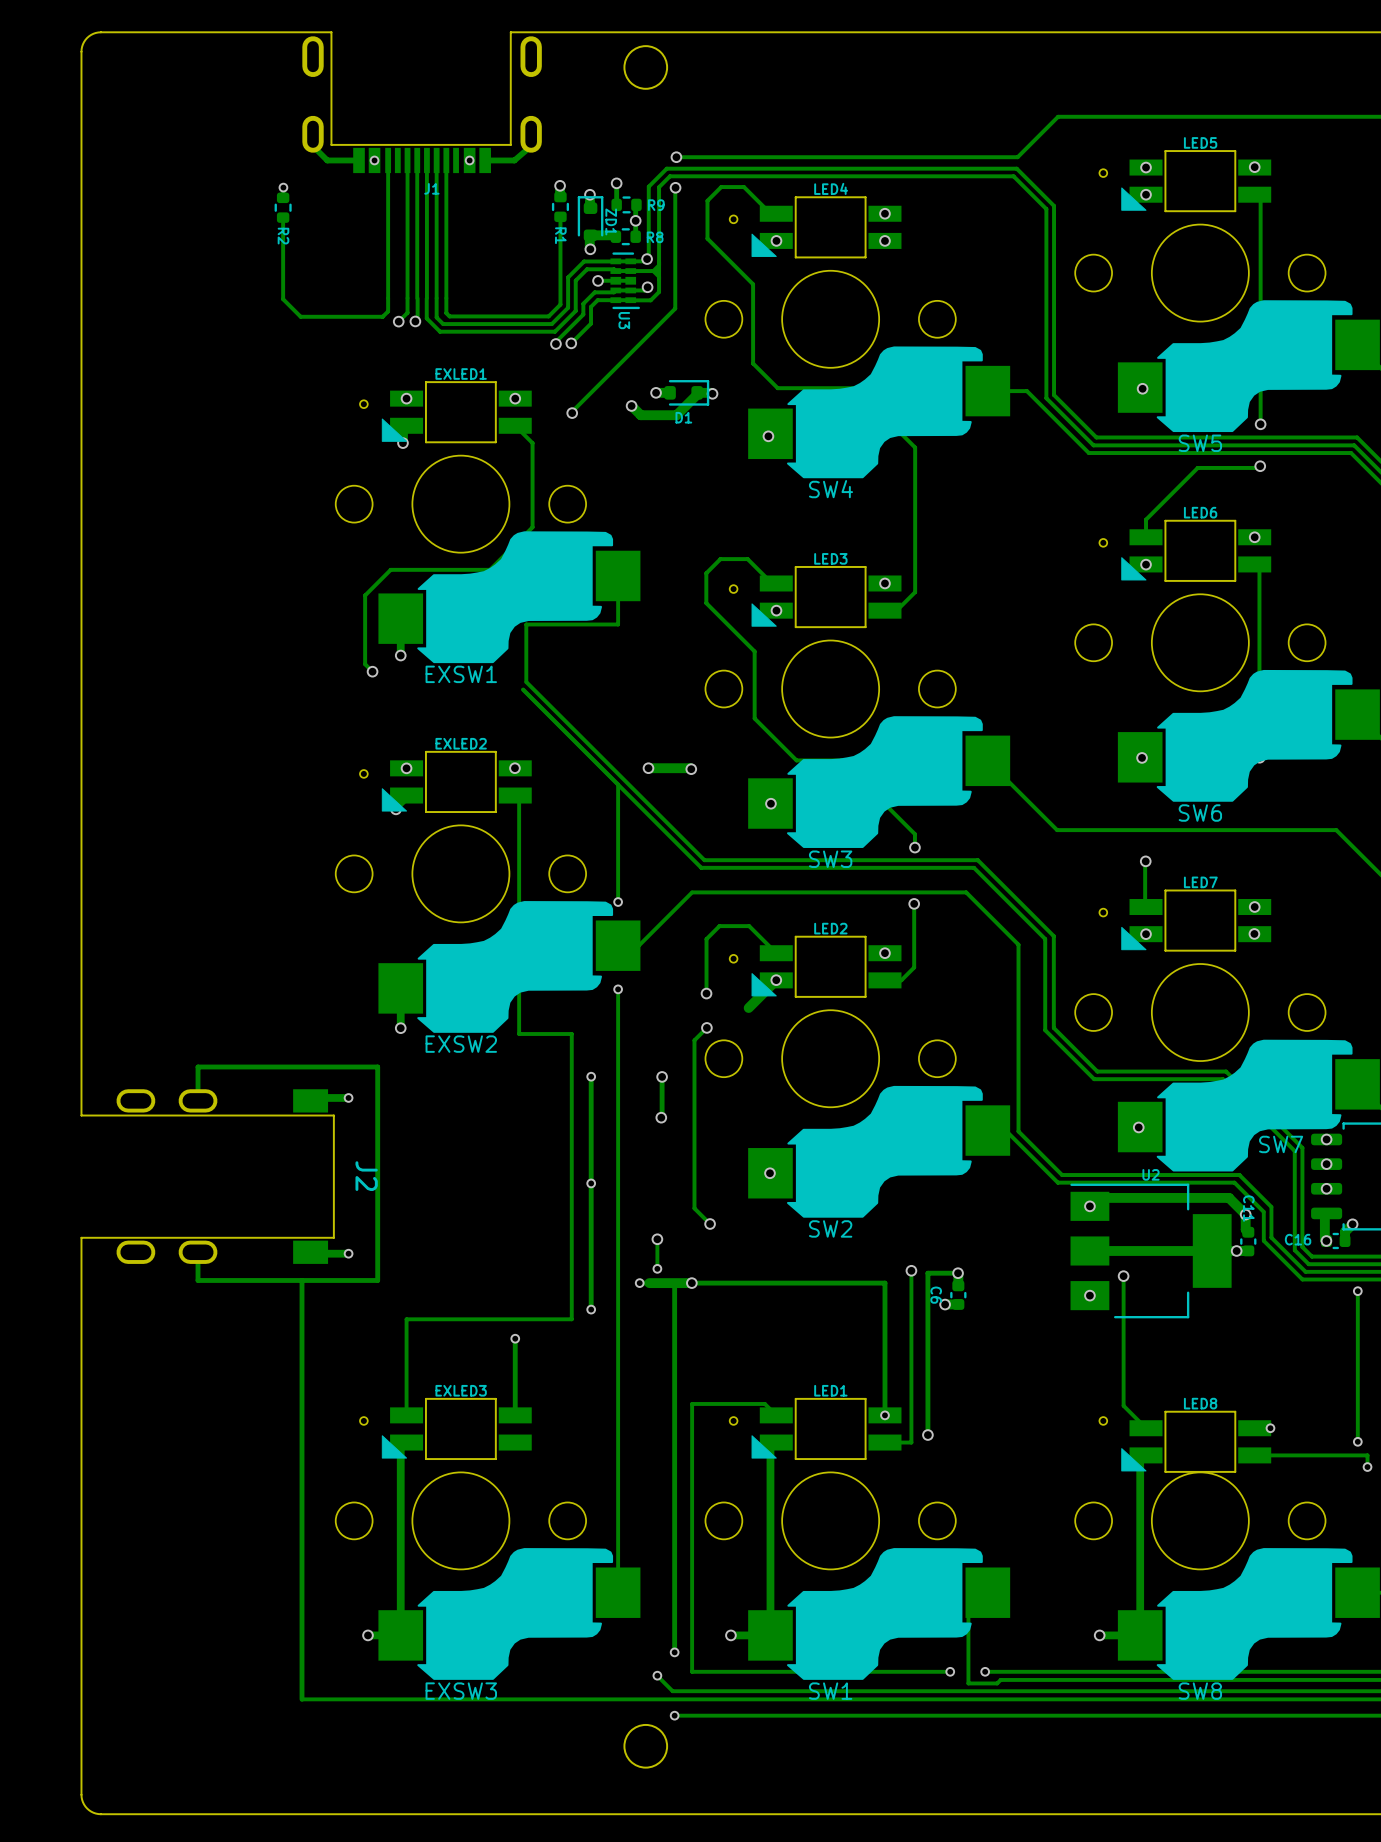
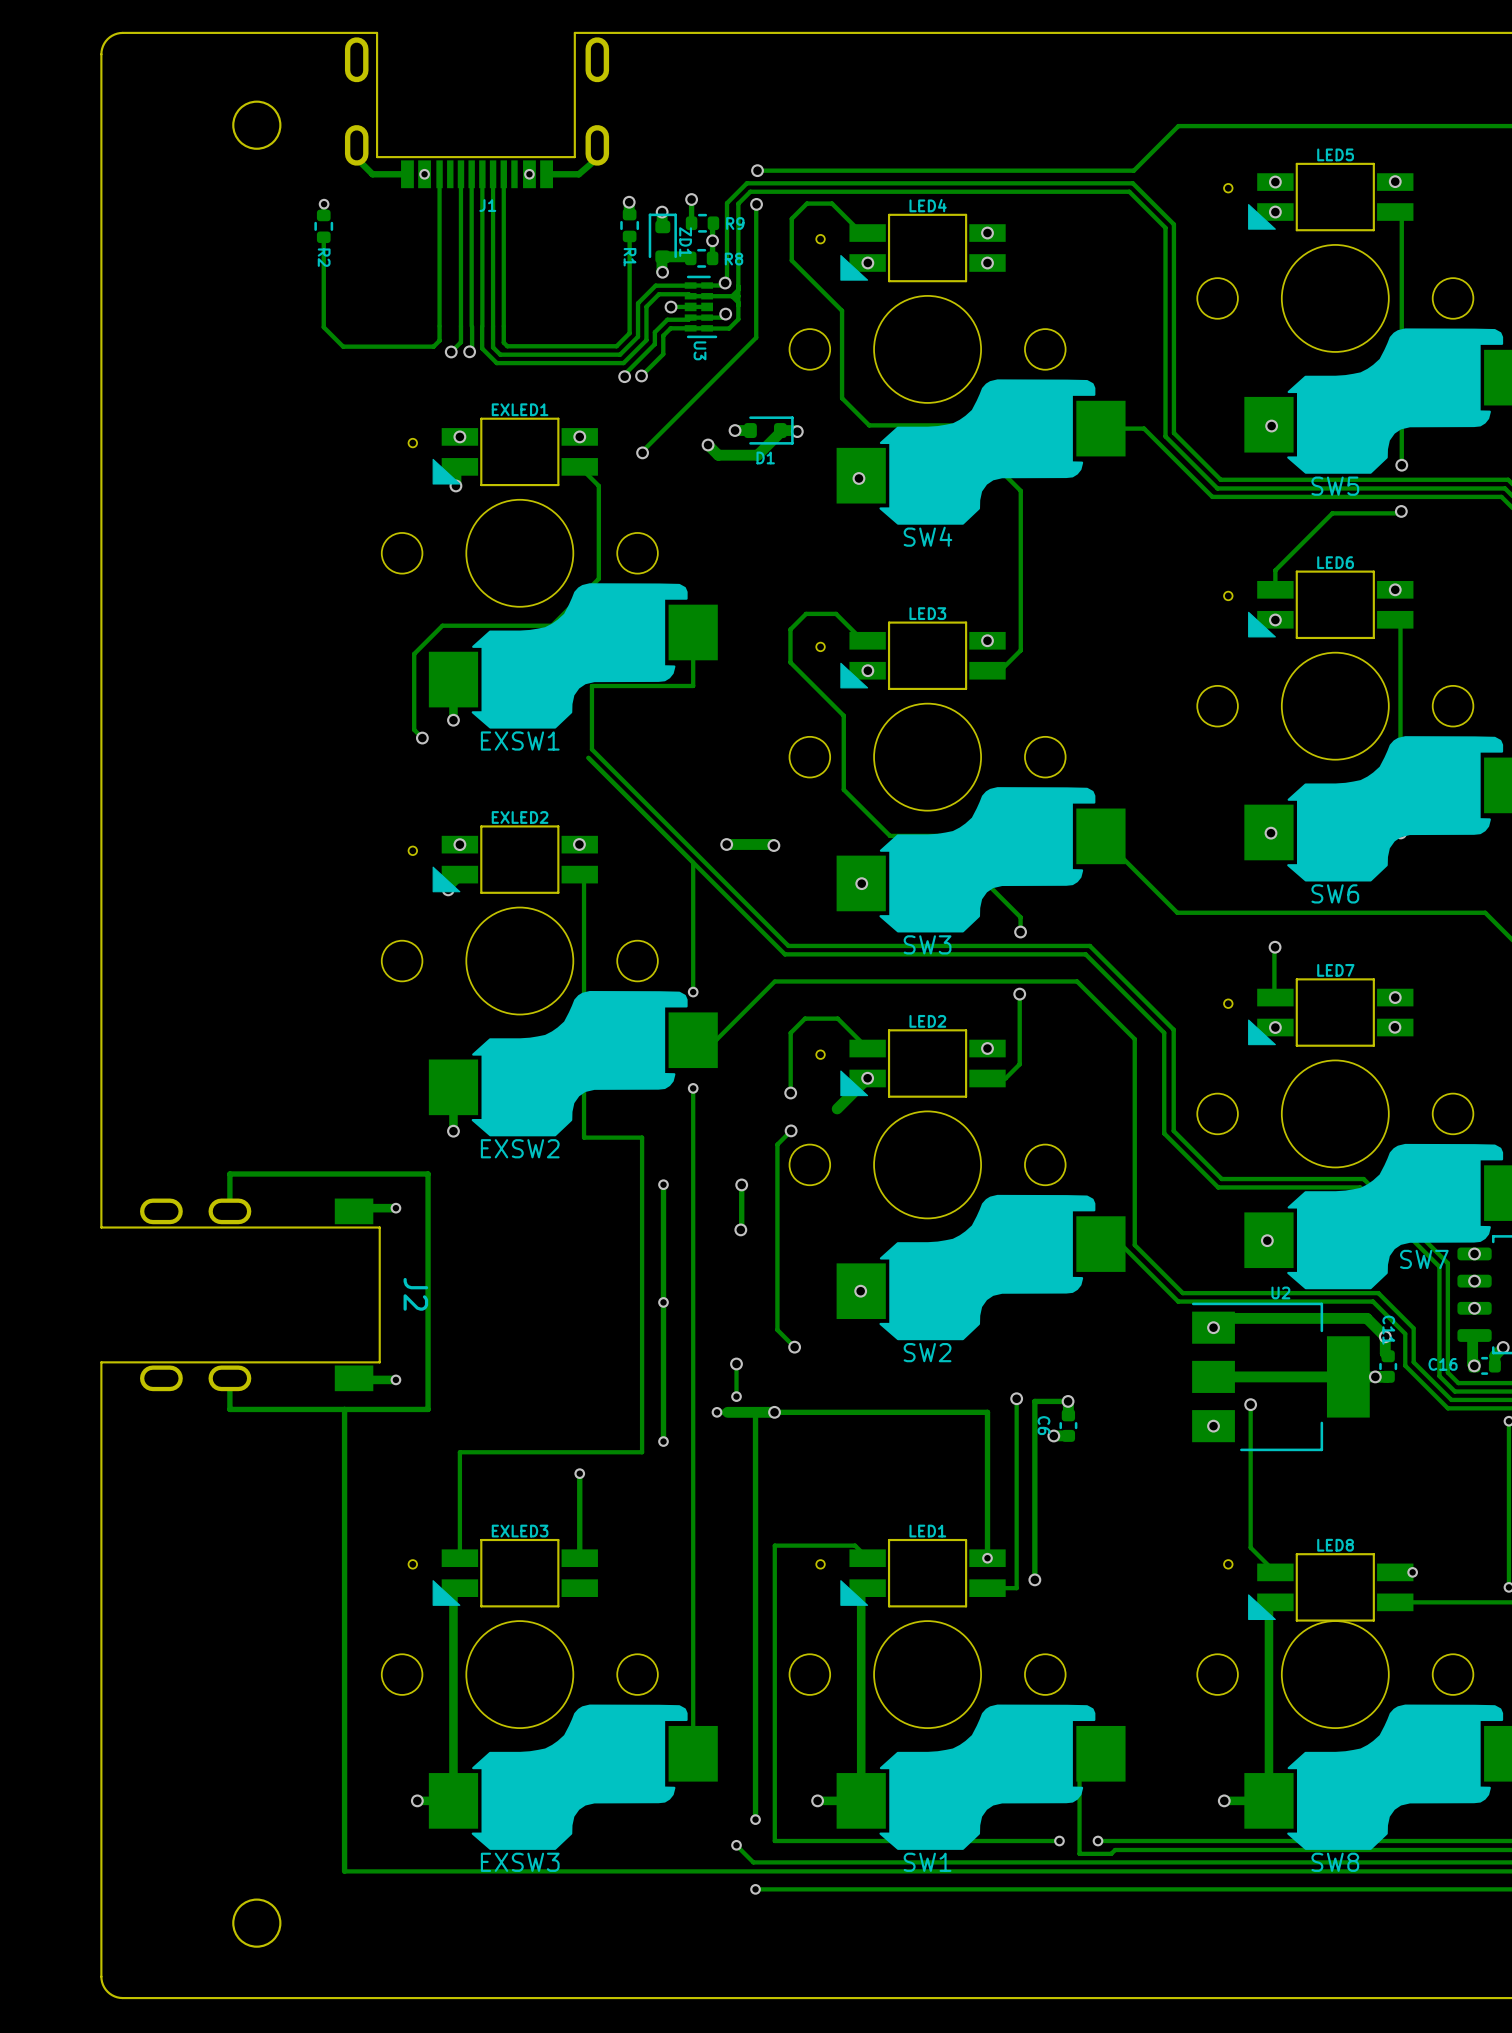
round board edge position: (645, 67) -> (256, 125)
round board edge position: (645, 1746) -> (256, 1923)

